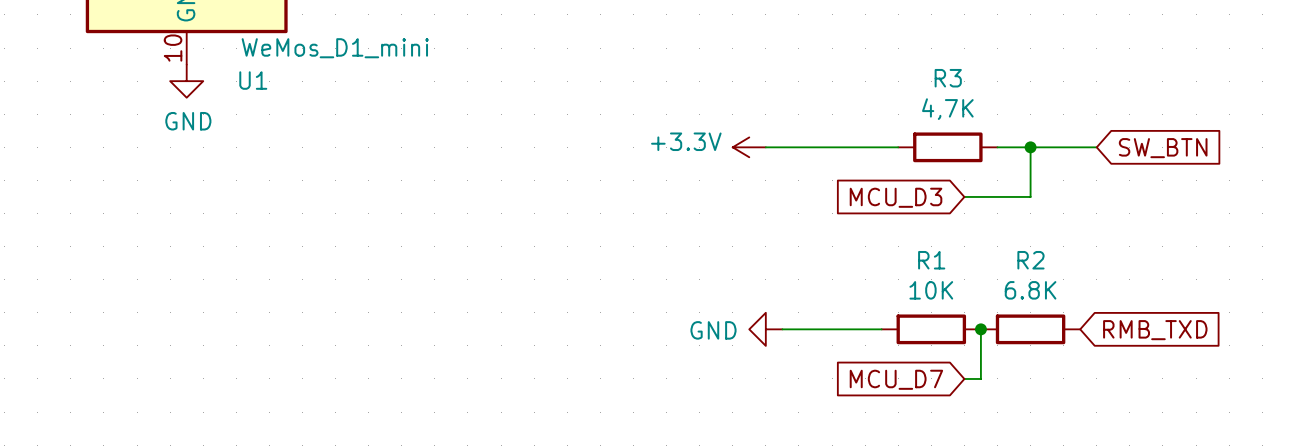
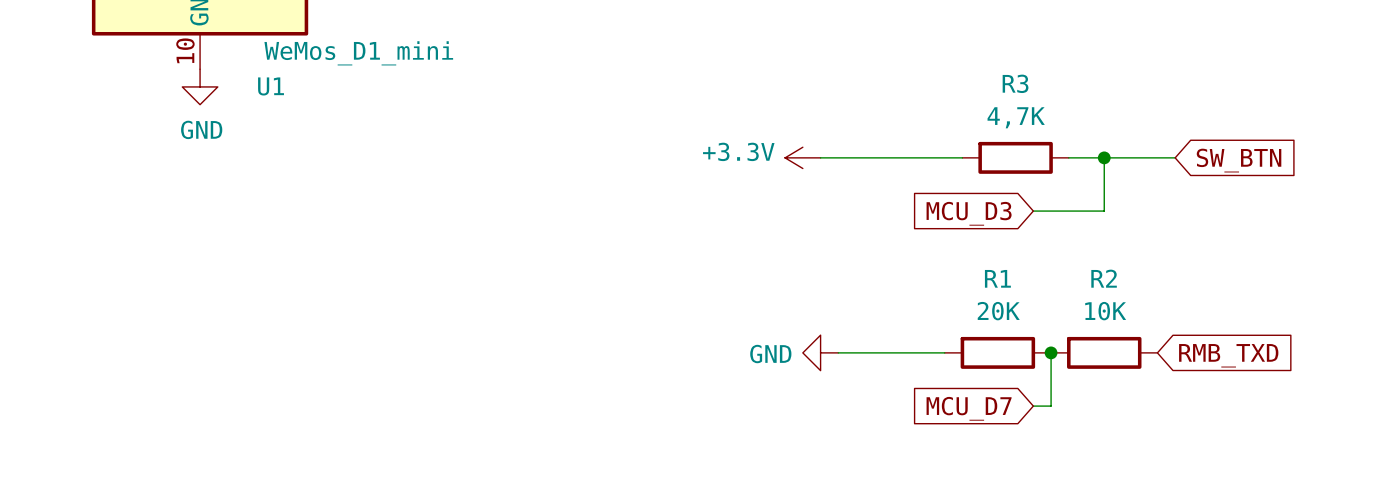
R1 value: 10K (931, 290) -> 20K (998, 311)
R2 value: 6.8K (1030, 290) -> 10K (1105, 311)

